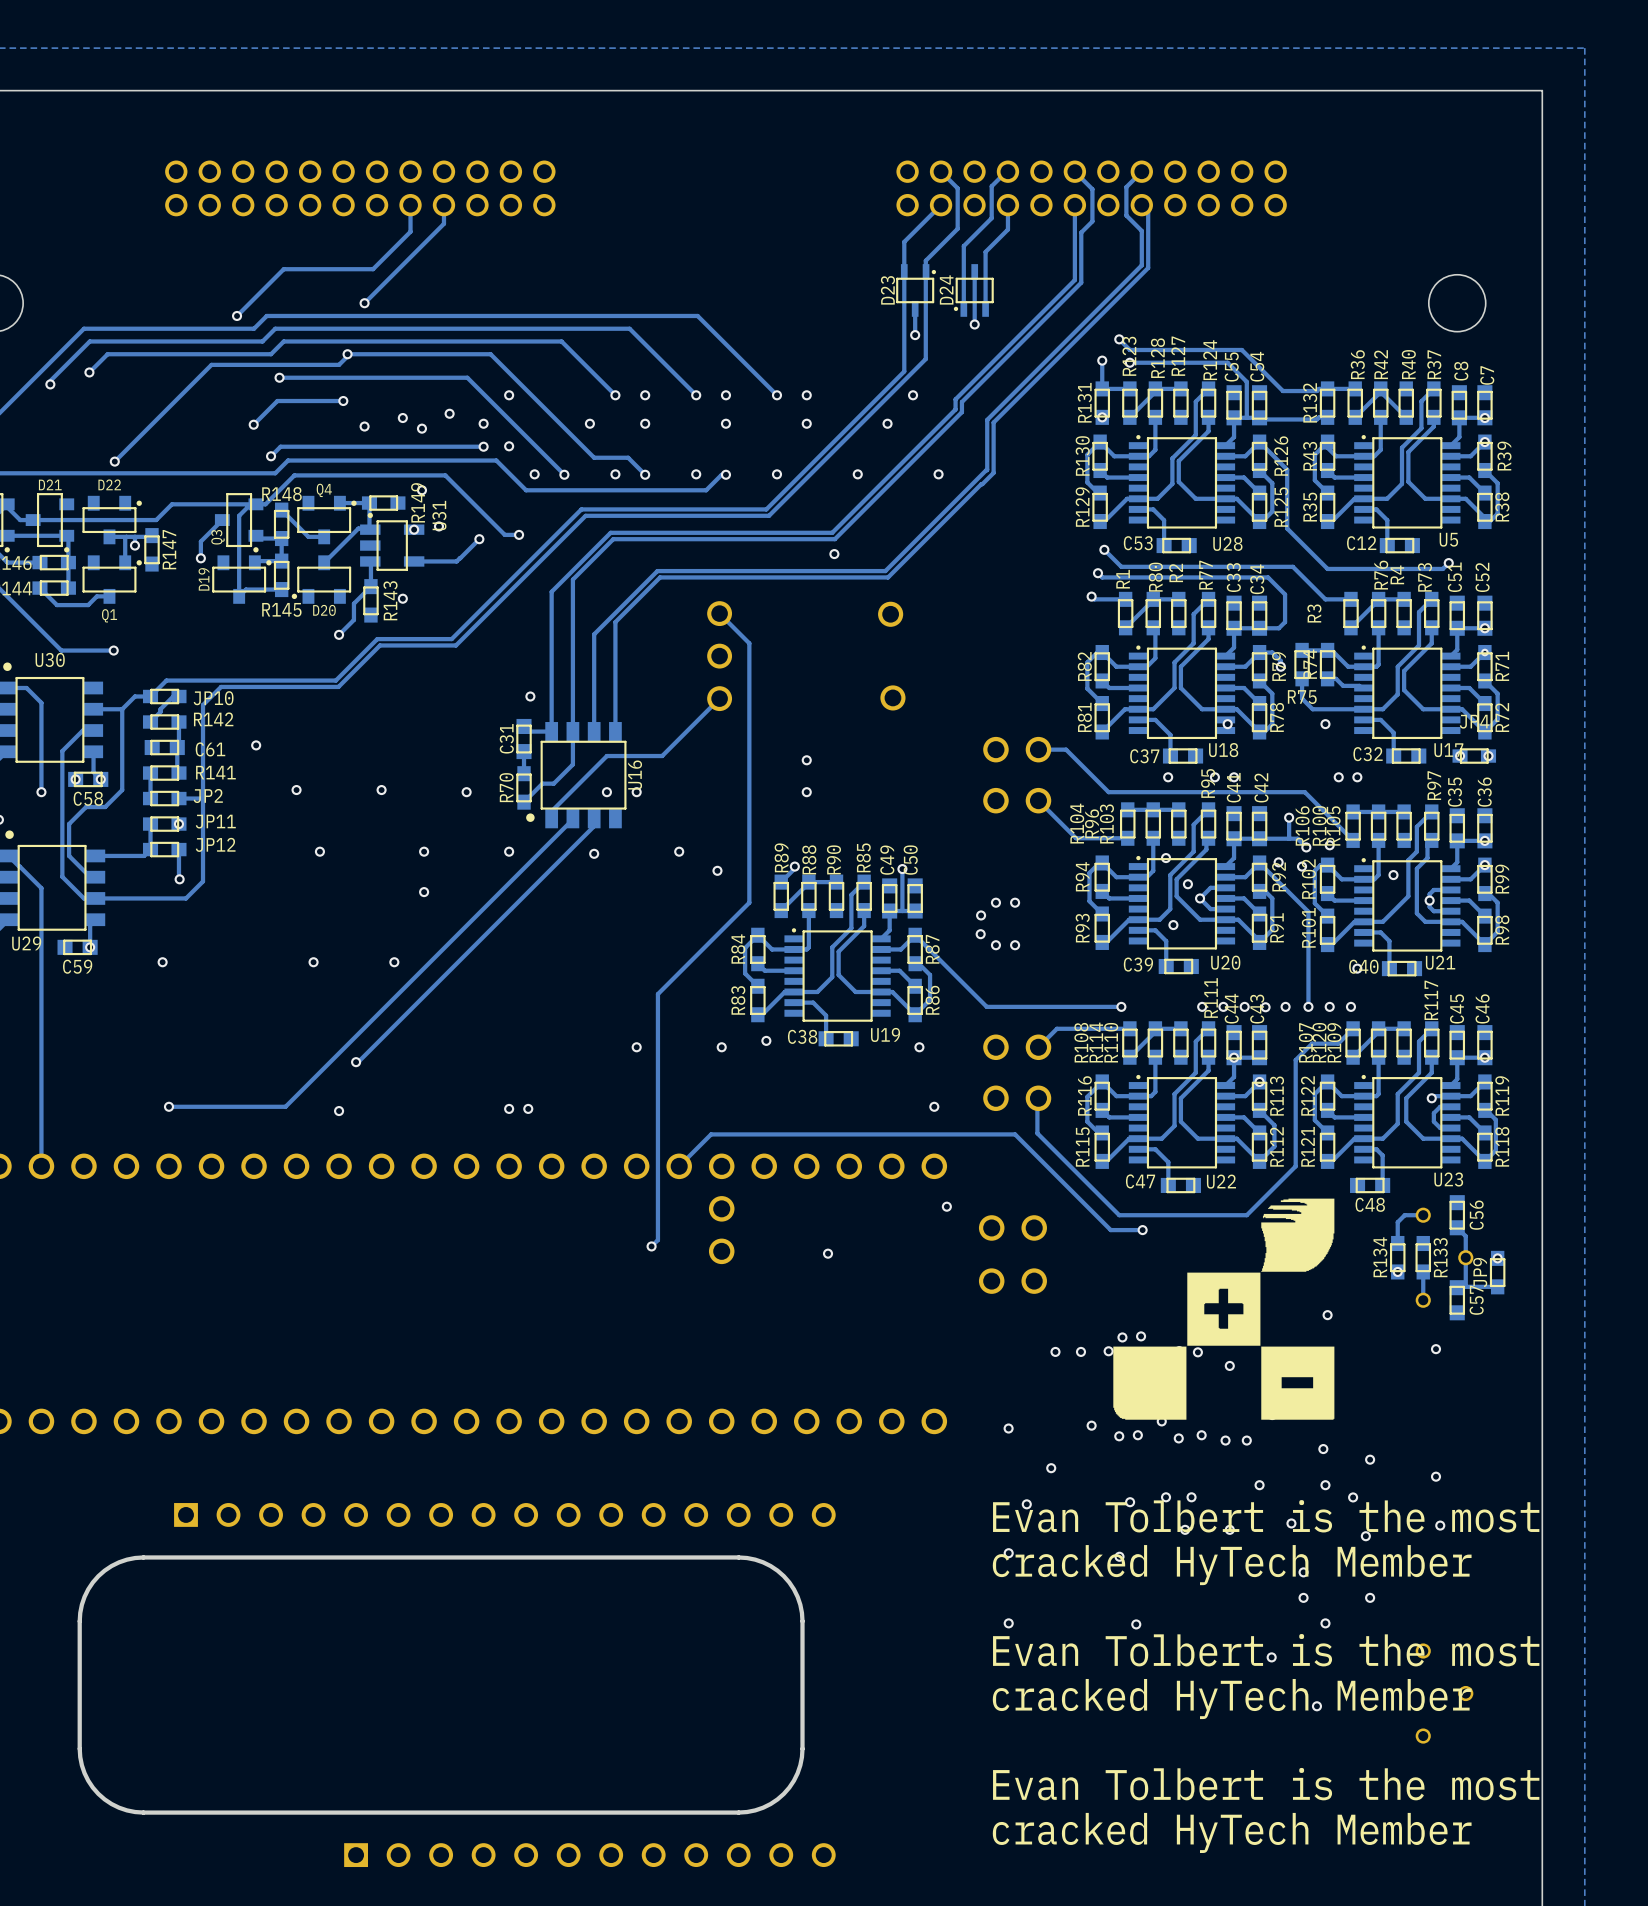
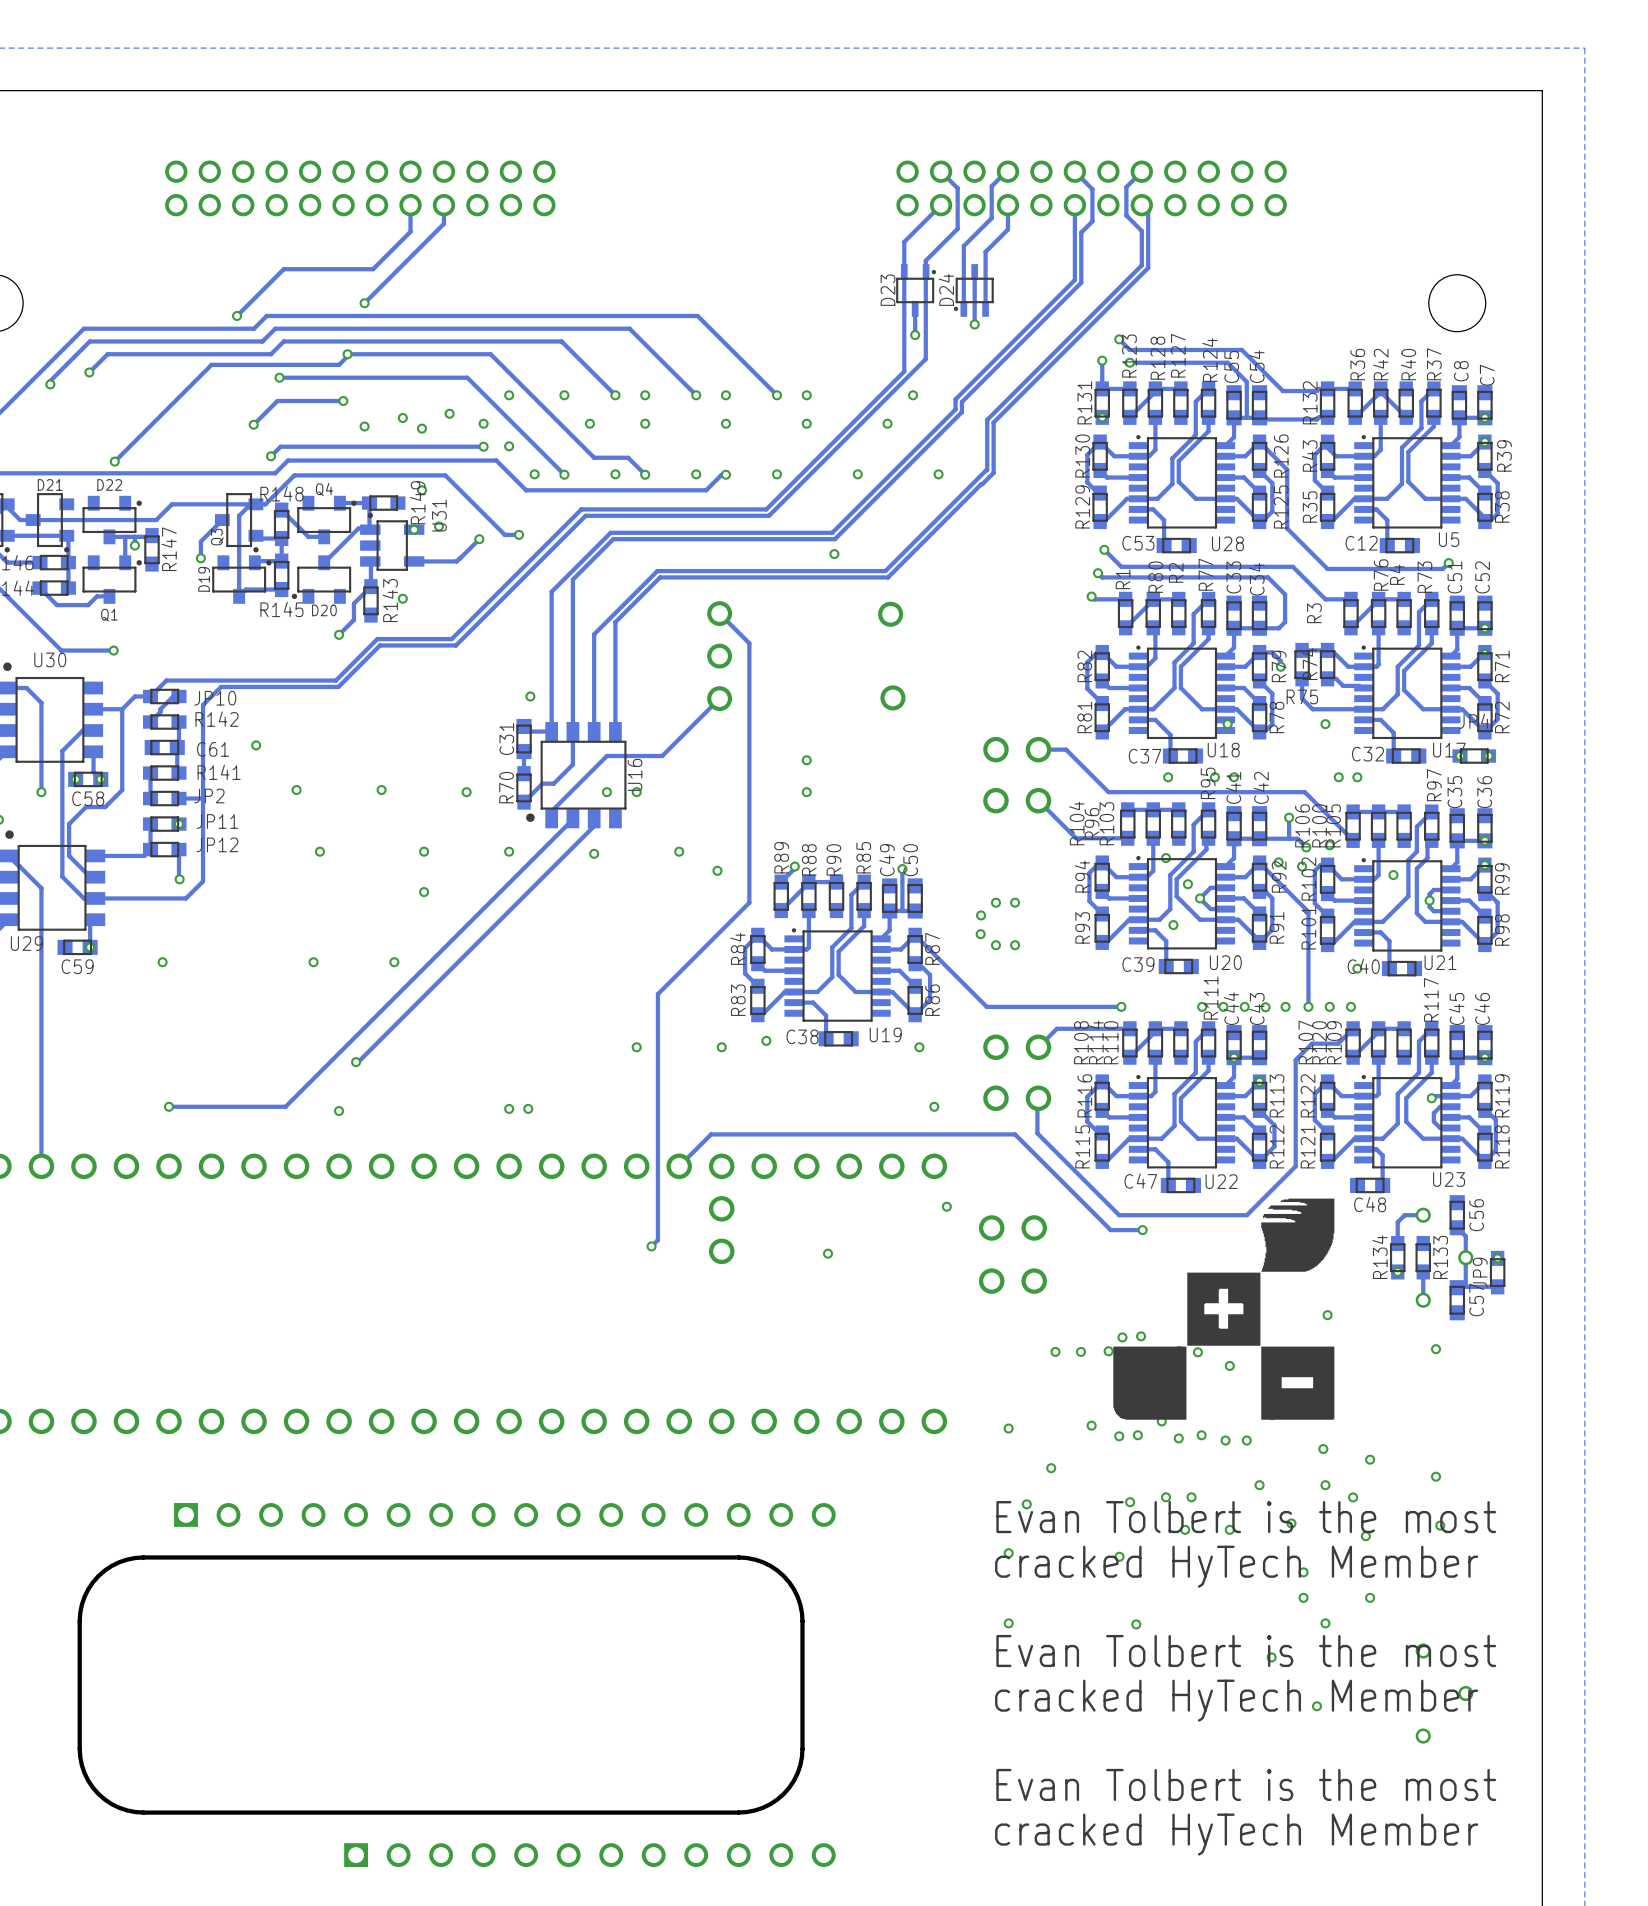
via: none -> (564, 395)

